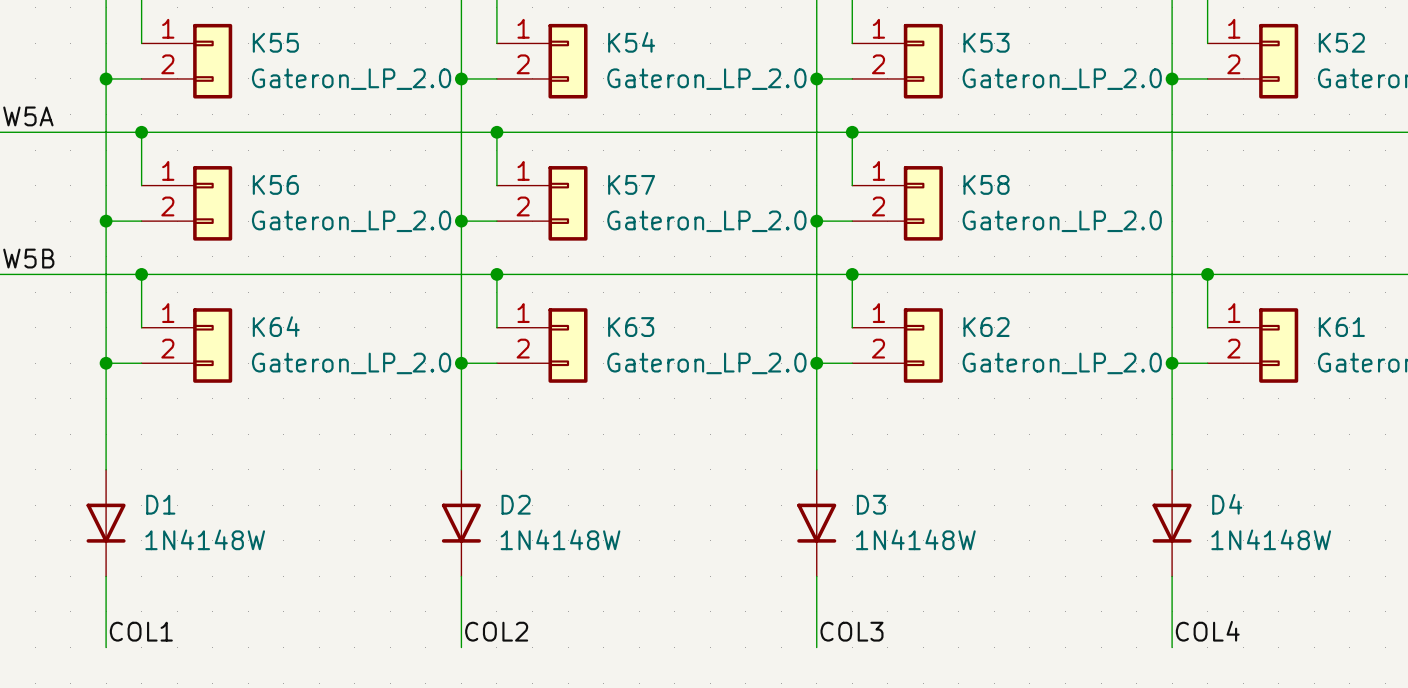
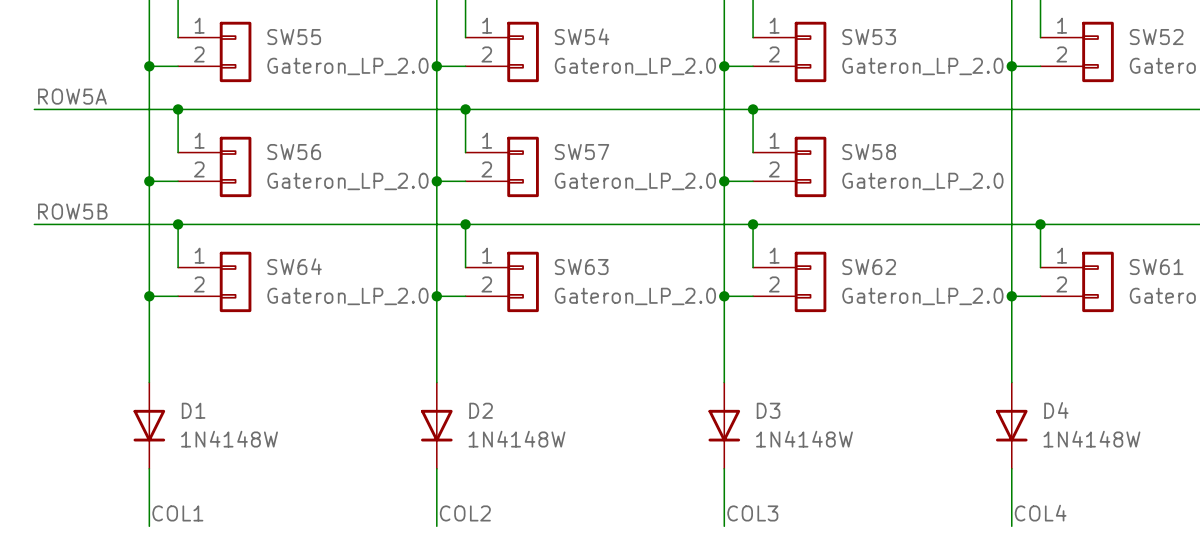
K55 name: K55 (275, 42) -> SW55 (294, 37)
K54 name: K54 (631, 42) -> SW54 (582, 36)
K53 name: K53 (986, 42) -> SW53 (869, 37)
K52 name: K52 (1341, 42) -> SW52 (1156, 37)
K56 name: K56 (275, 184) -> SW56 (294, 152)
K57 name: K57 (631, 184) -> SW57 (582, 152)
K58 name: K58 (986, 184) -> SW58 (869, 152)
K64 name: K64 (276, 326) -> SW64 (294, 266)
K63 name: K63 (631, 327) -> SW63 (581, 267)
K62 name: K62 (986, 327) -> SW62 (869, 267)
K61 name: K61 (1341, 327) -> SW61 (1156, 267)

